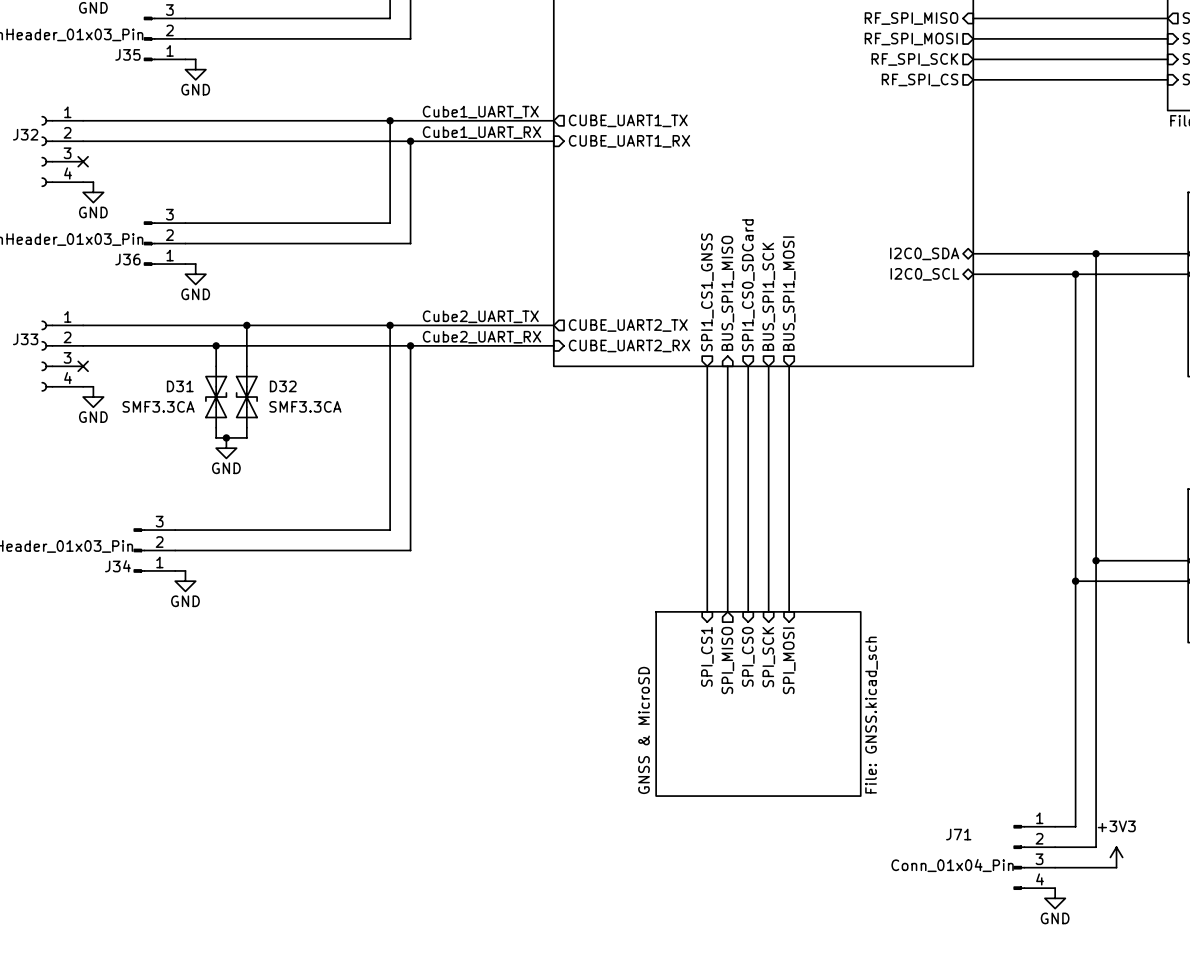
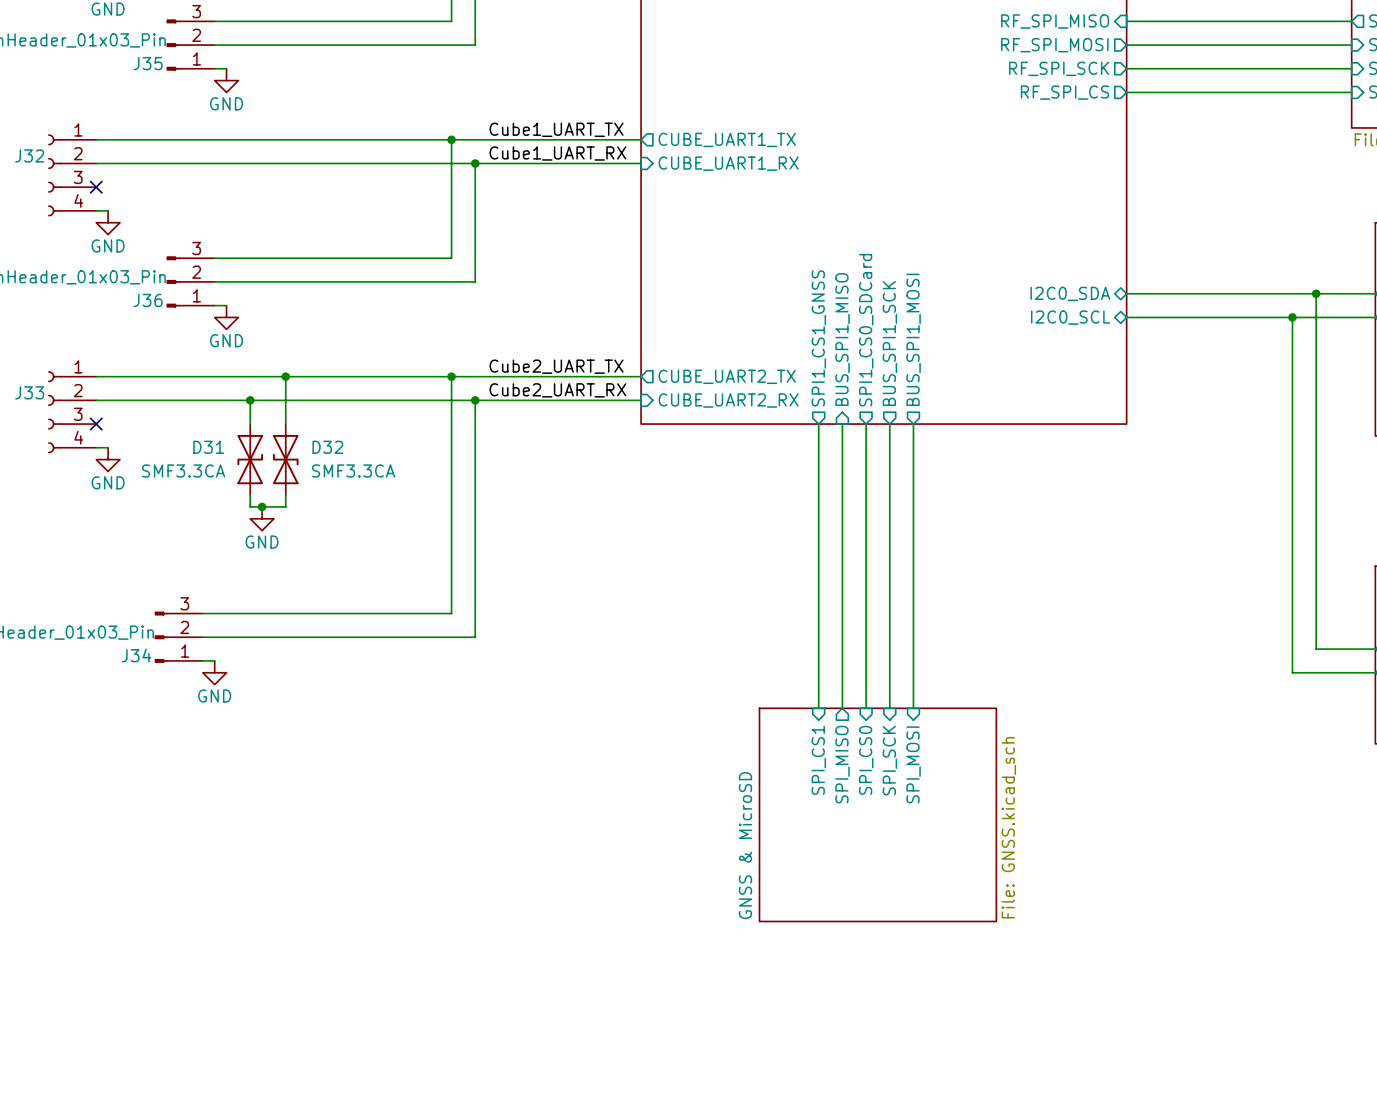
wire: (1096, 253) (1096, 847) (1055, 847) -> none
junction: (1096, 253) -> none
junction: none -> (1316, 293)
wire: (1075, 274) (1075, 826) (1055, 826) -> none
junction: (1075, 274) -> none
junction: none -> (1292, 317)
wire: (1096, 560) (1136, 560) -> (1316, 293) (1316, 649)
junction: (1096, 560) -> none
wire: (1075, 581) (1116, 581) -> (1292, 317) (1292, 672)
junction: (1075, 581) -> none
J71: Conn_01x04_Pin (1034, 857) -> none
power symbol: +3V3 (1116, 857) -> none
wire: (1055, 867) (1116, 867) -> none
power symbol: GND (1055, 898) -> none

